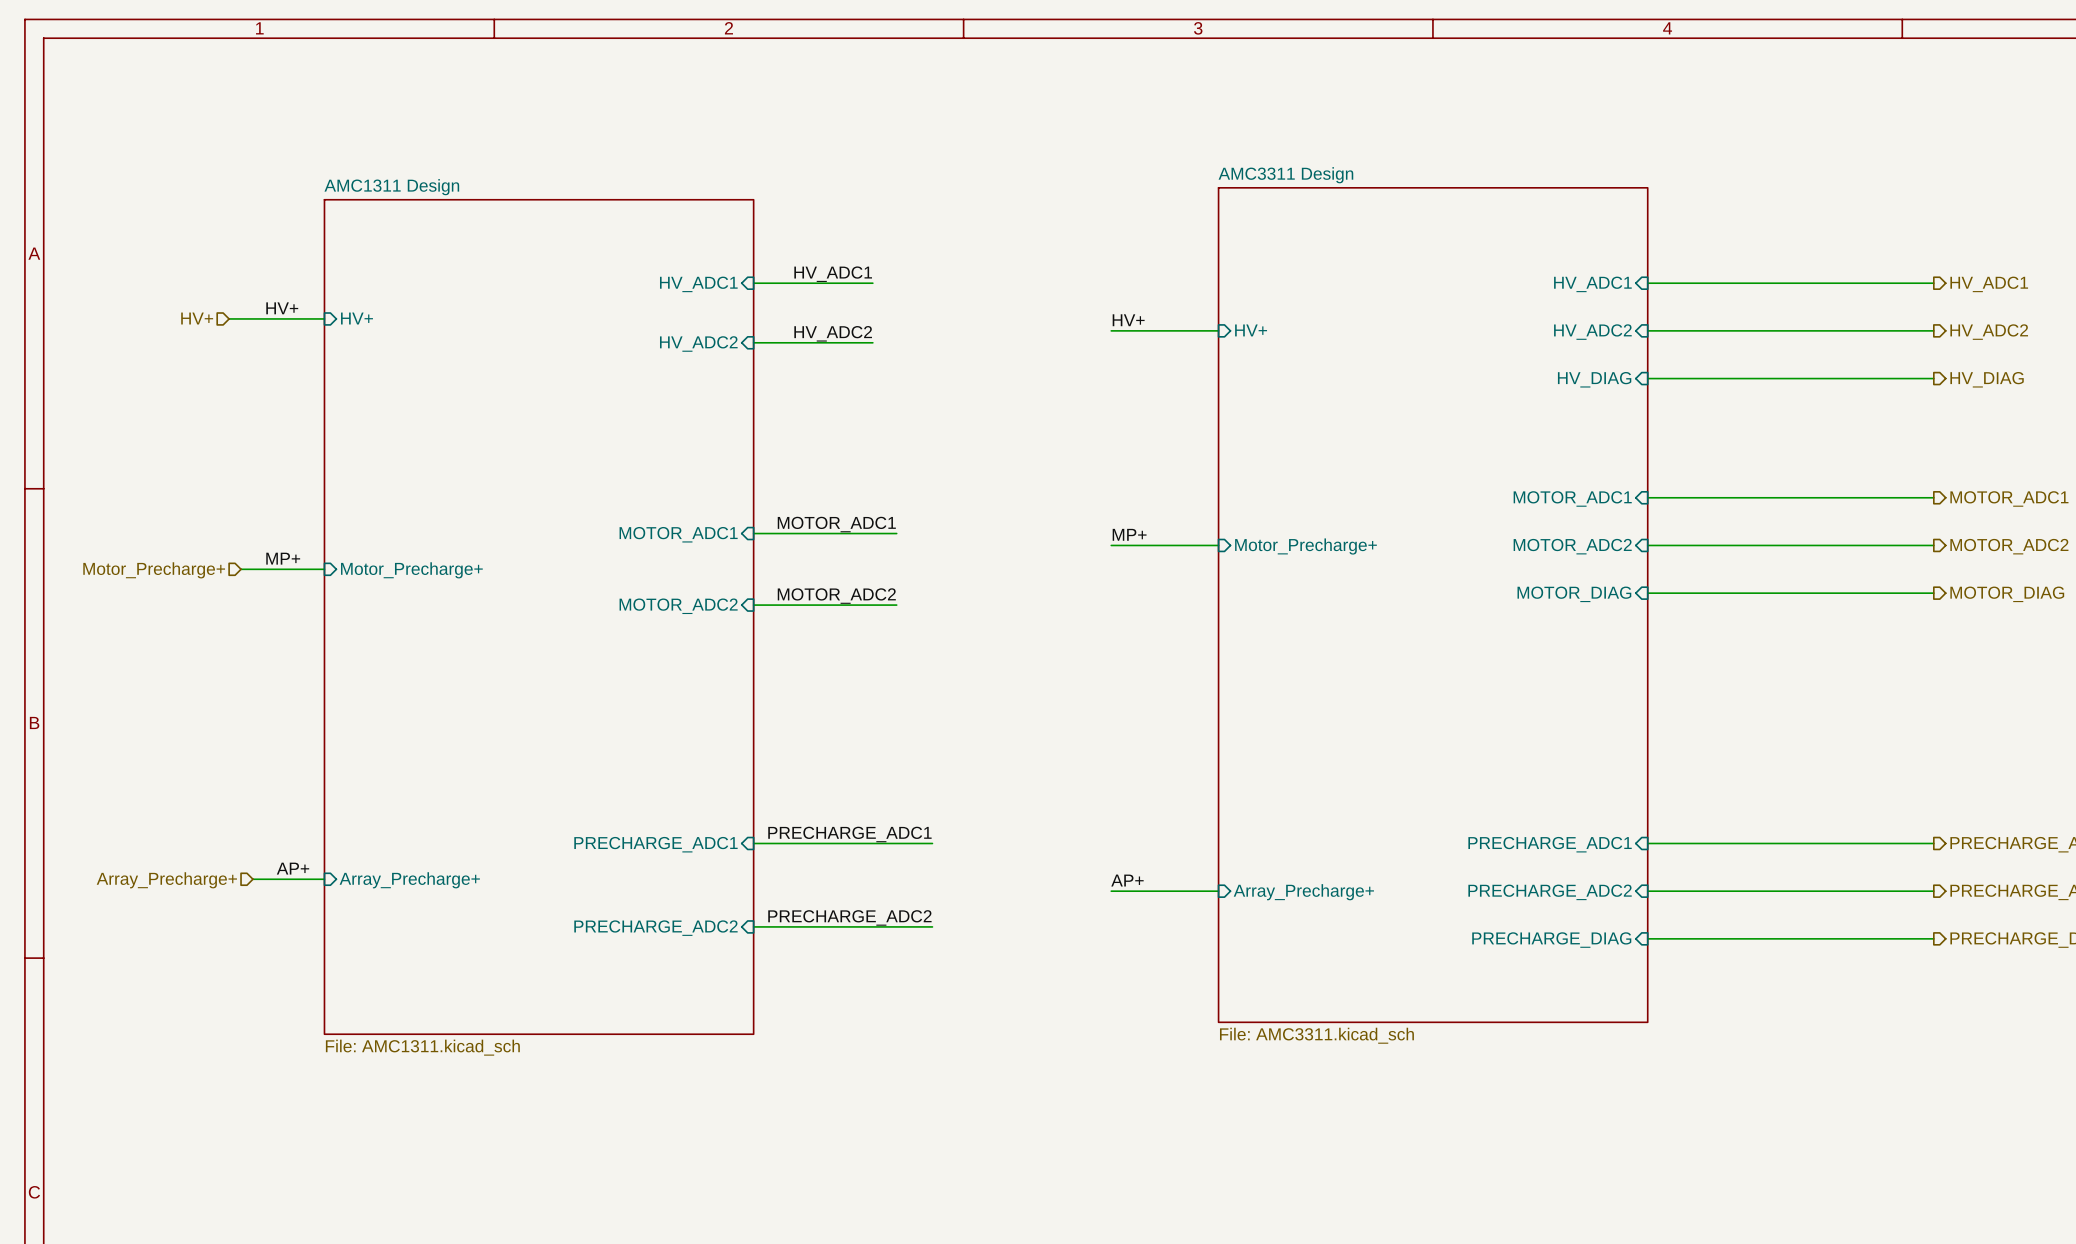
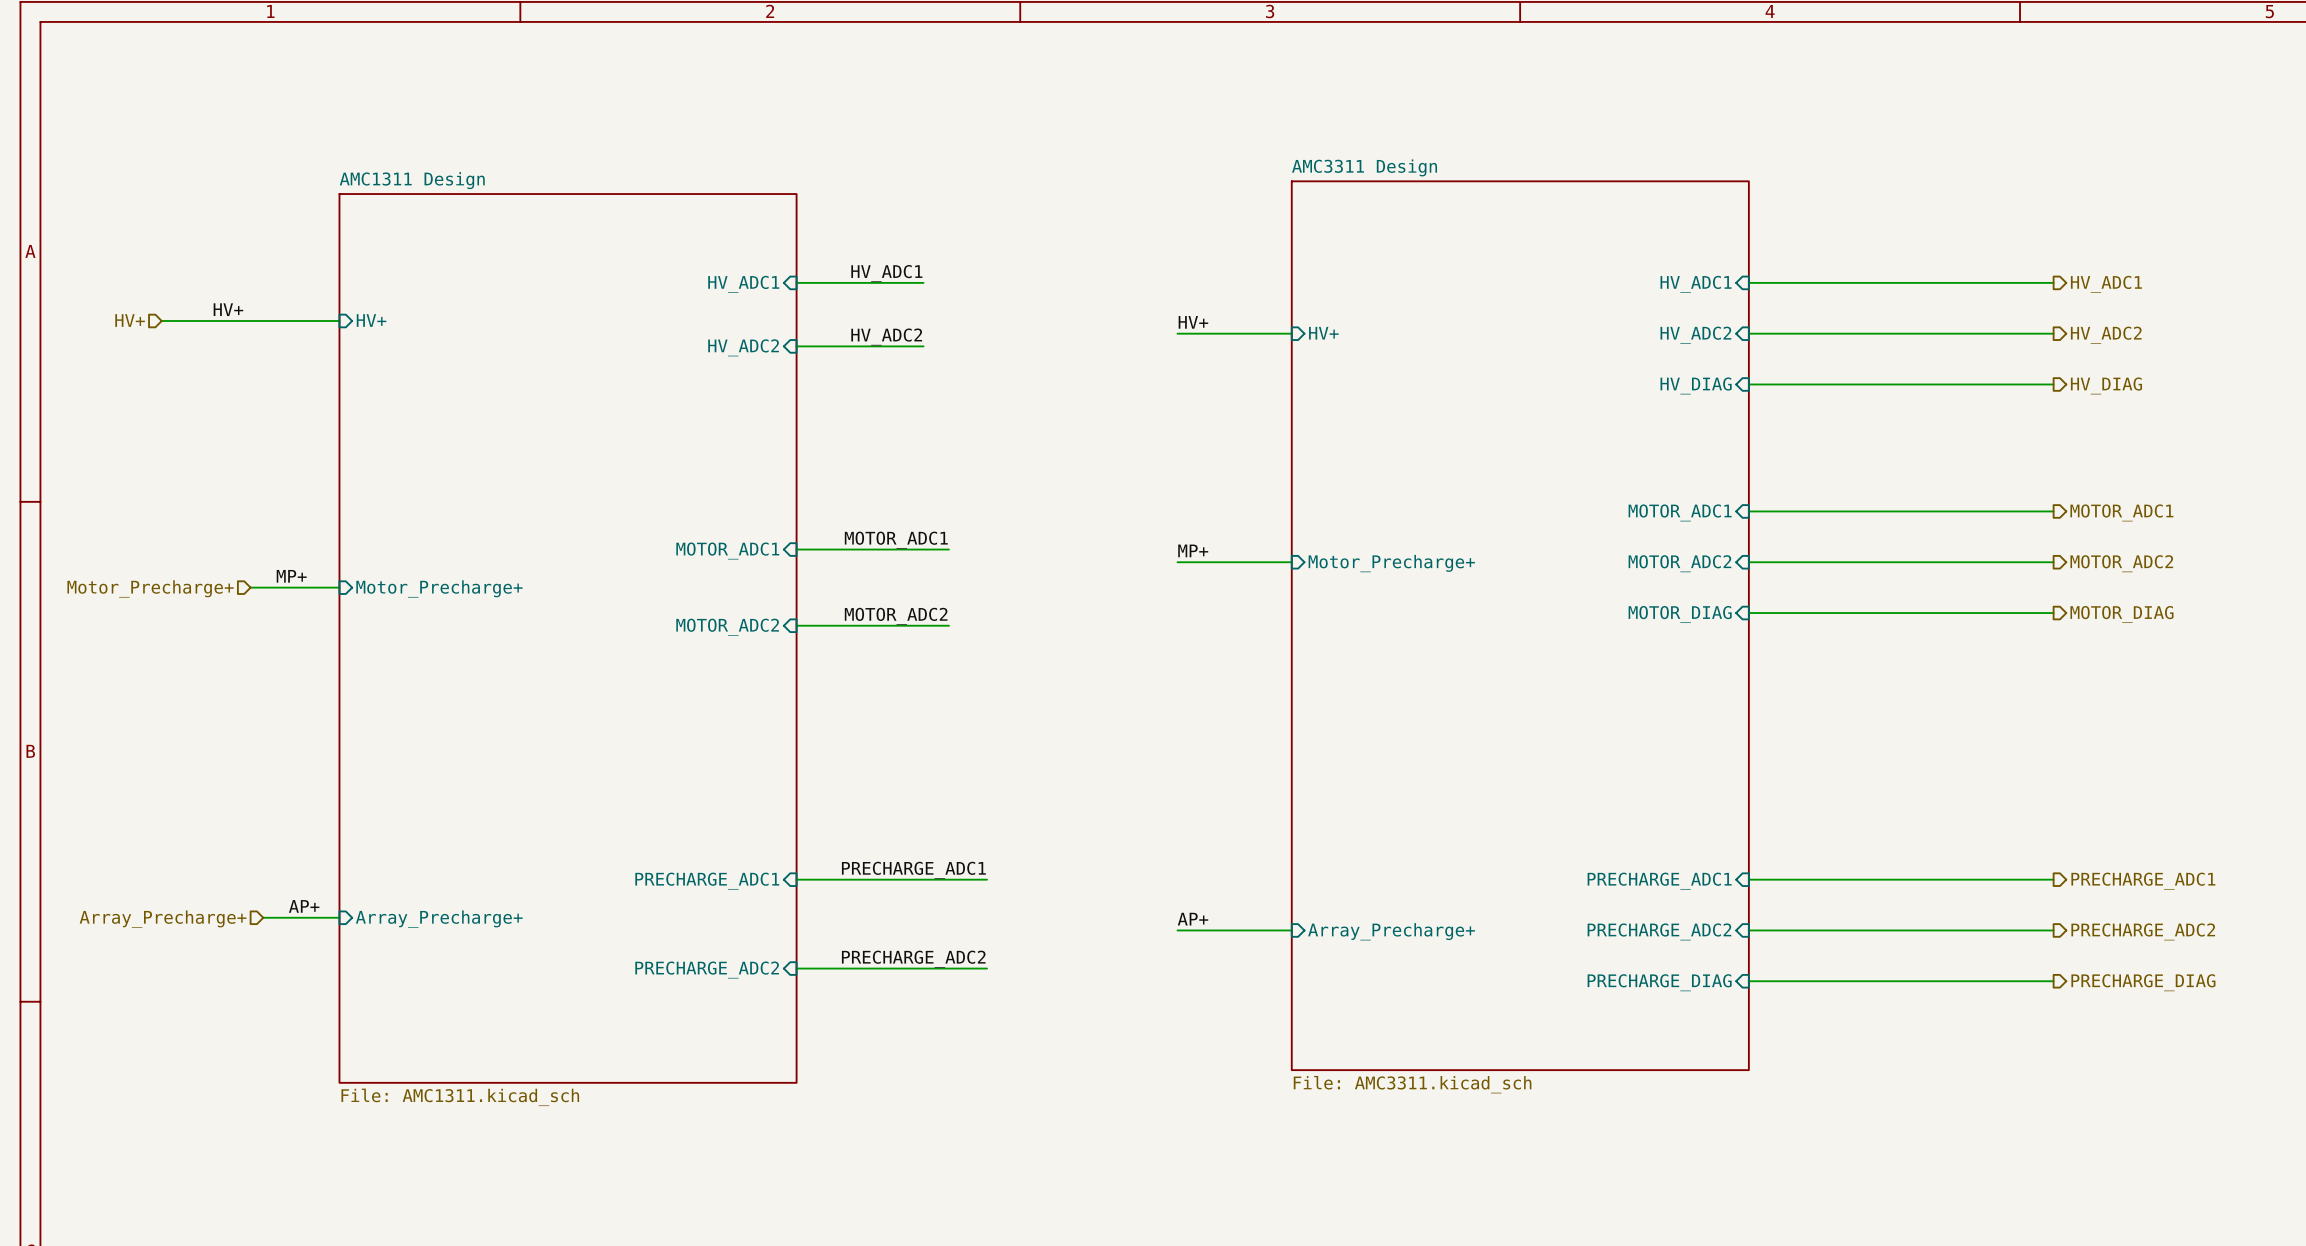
label position: HV+ (282, 308) -> HV+ (228, 309)
wire: none -> (161, 320) (237, 320)
hierarchical label position: HV+ (197, 318) -> HV+ (130, 320)

